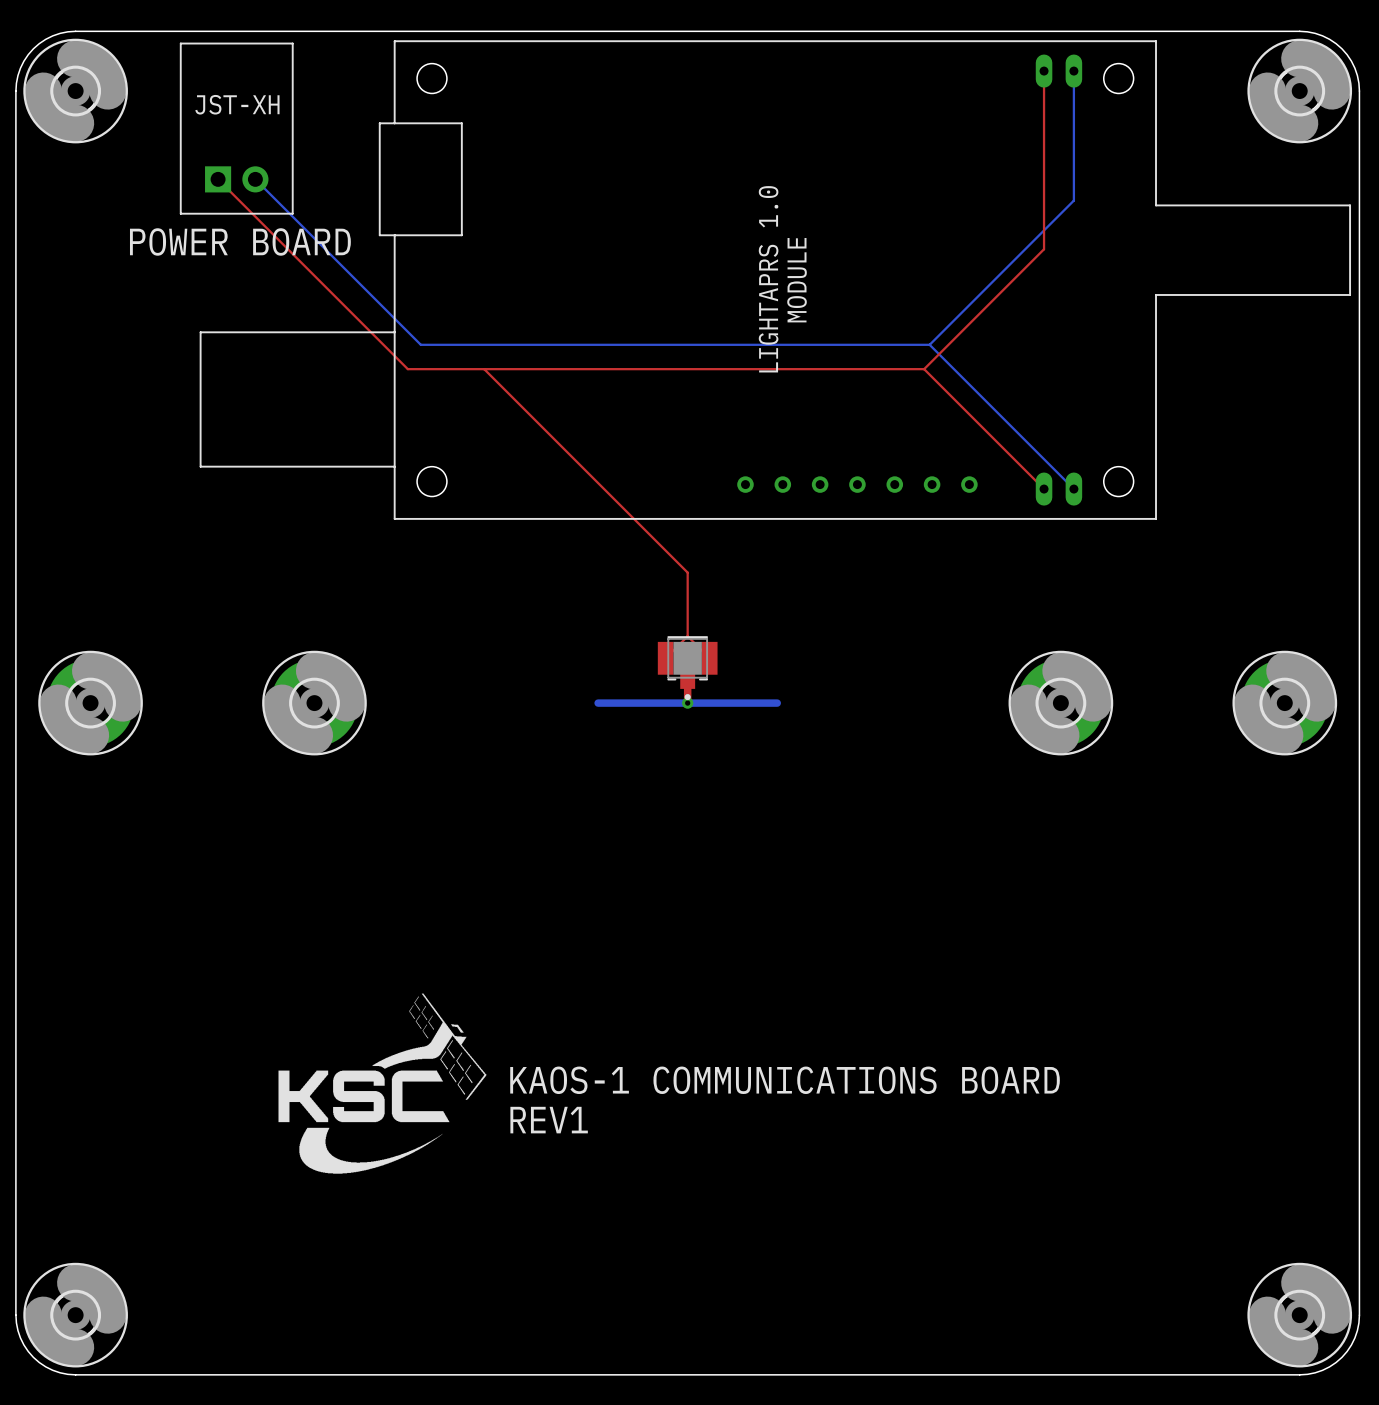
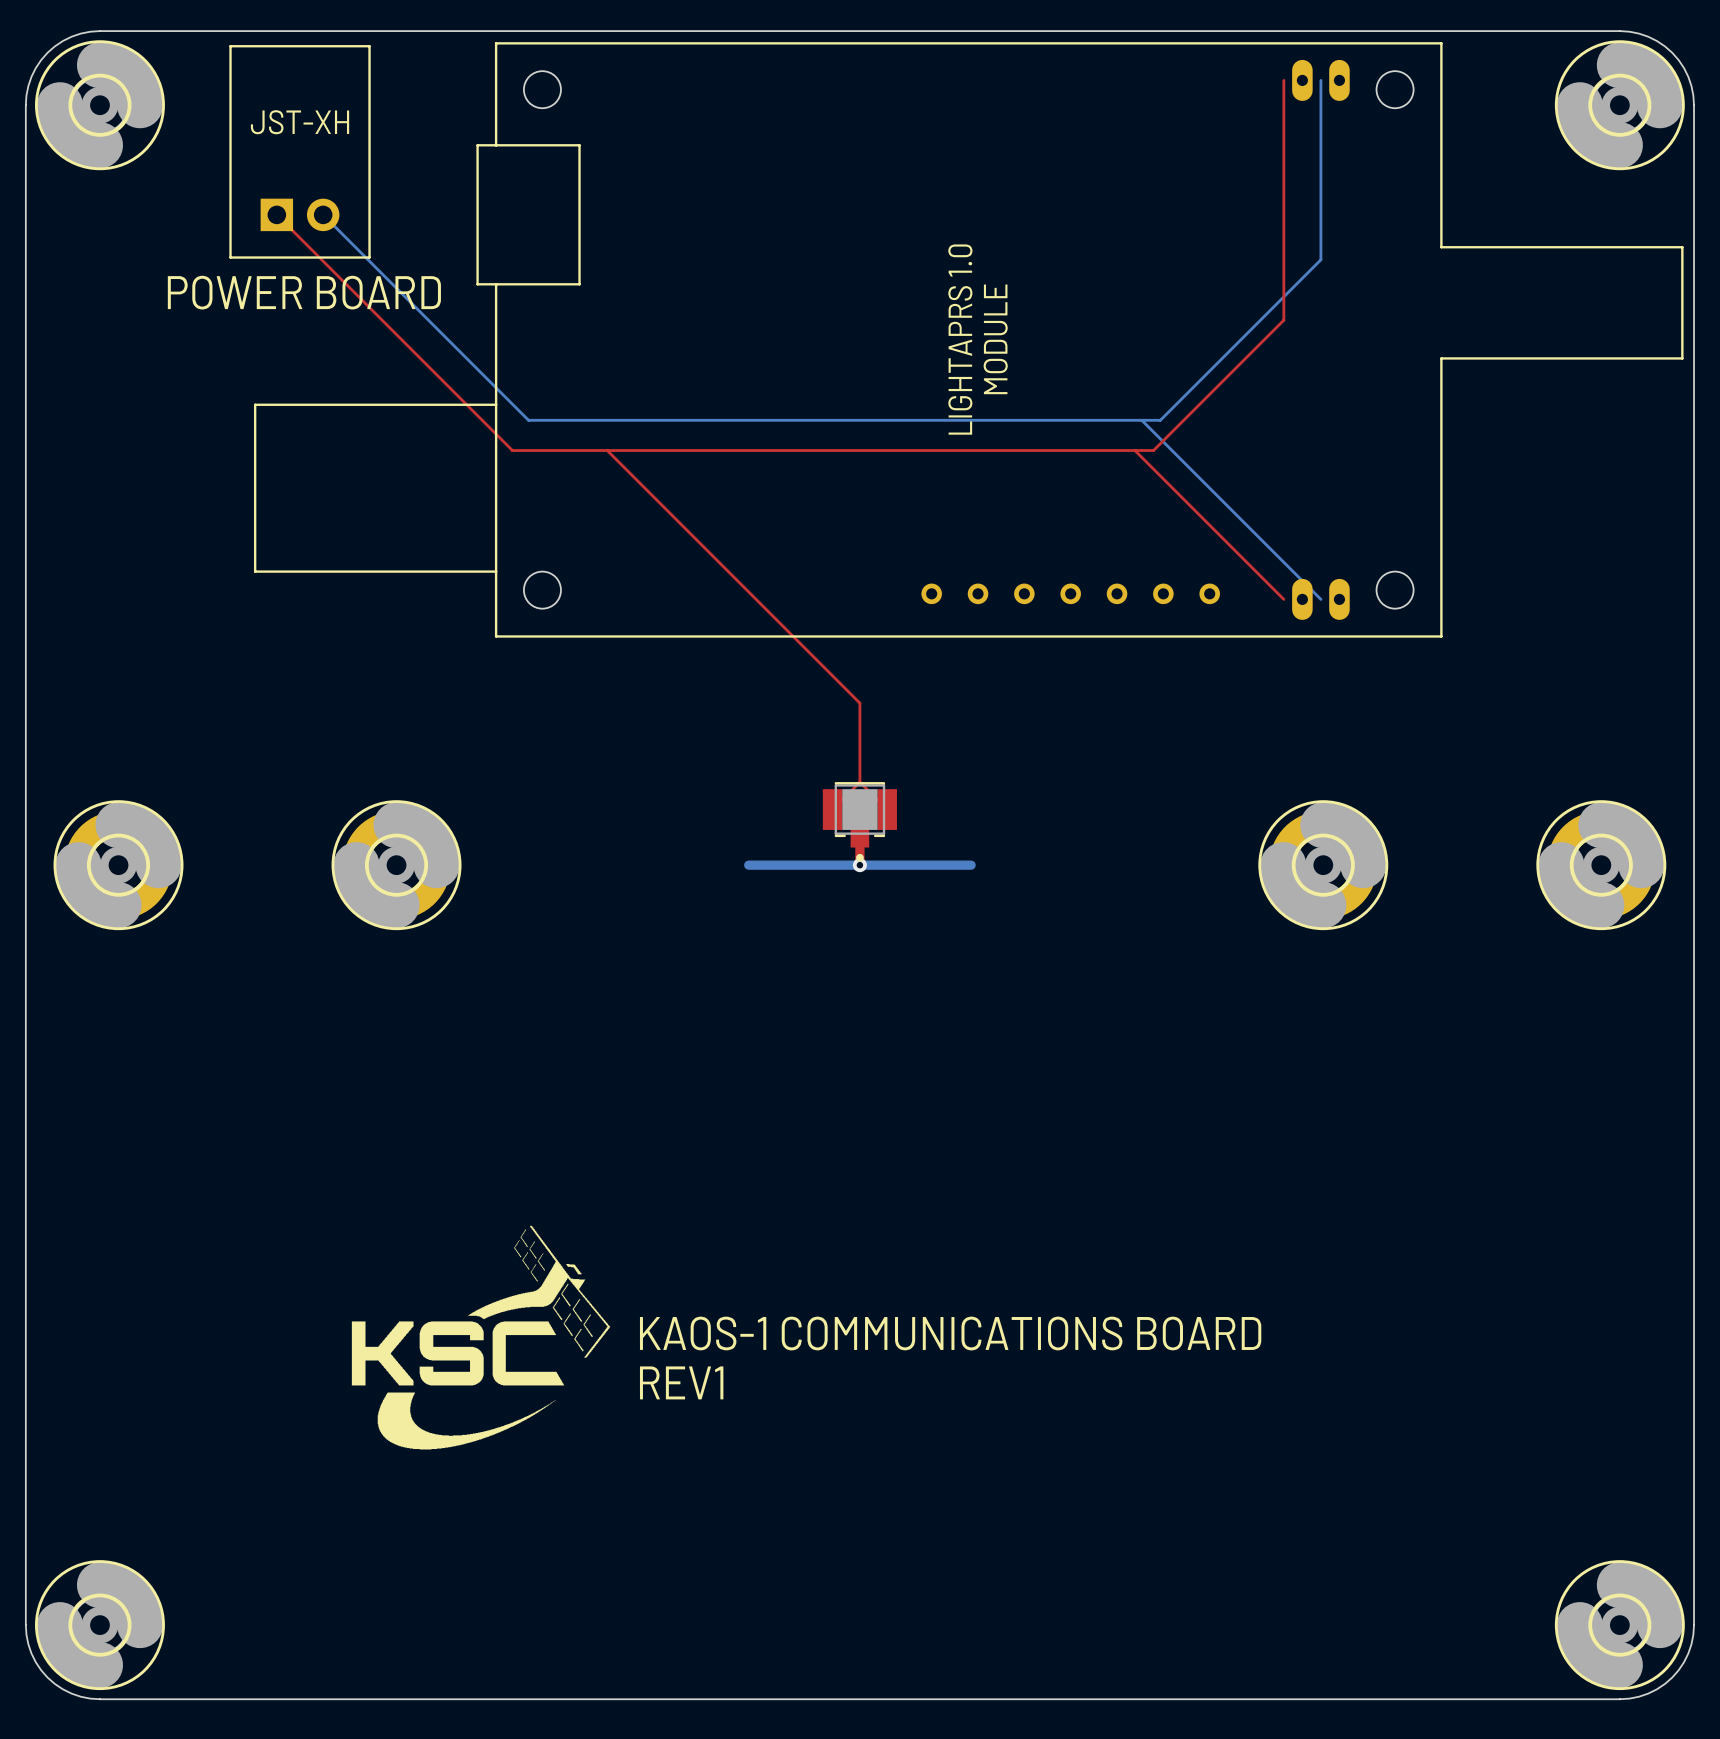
top track: (1044, 71) (1044, 249) (1029, 264) -> (1283, 80) (1283, 320)
bottom track: (1073, 71) (1073, 200) (1058, 215) -> (1320, 80) (1320, 259)
bottom track: (929, 344) (1073, 489) -> (1141, 420) (1320, 599)
top track: (924, 369) (1044, 489) -> (1134, 450) (1283, 599)

